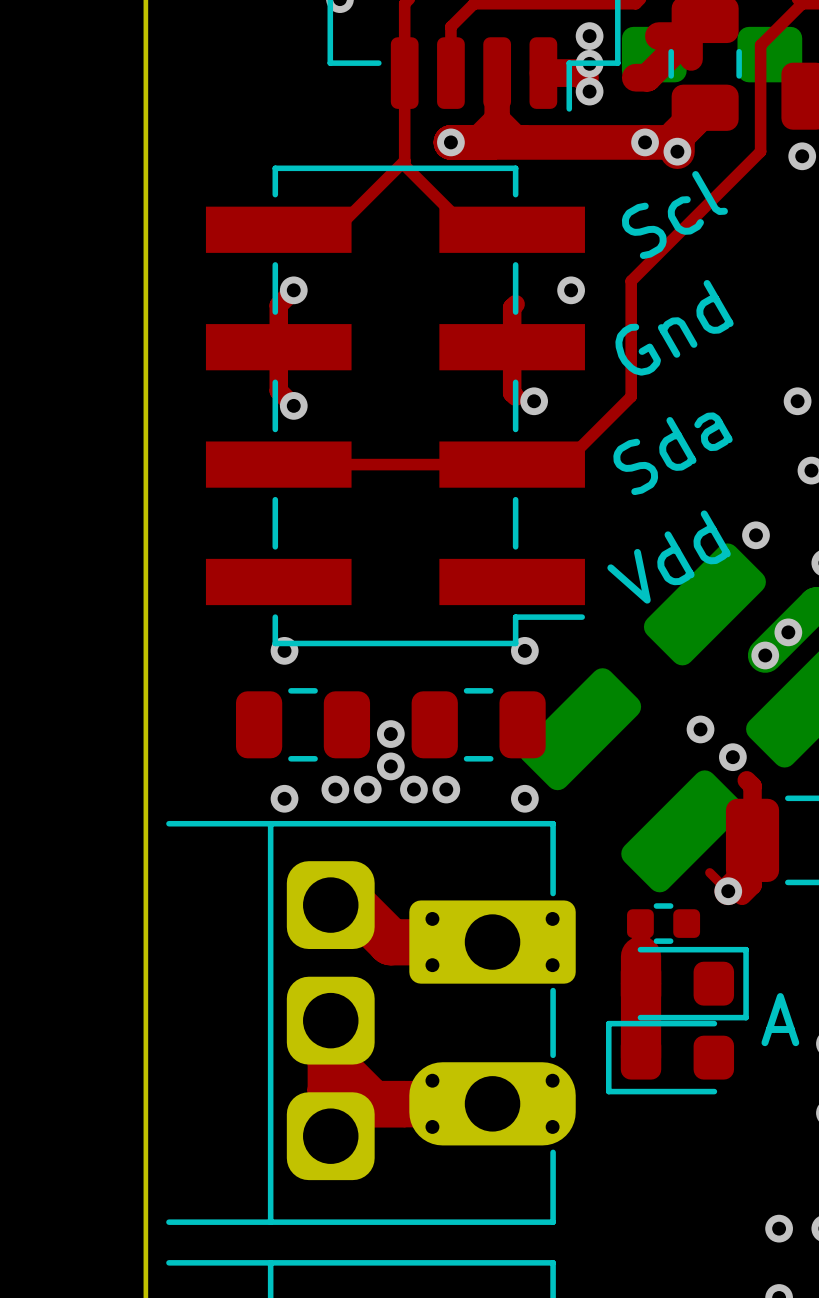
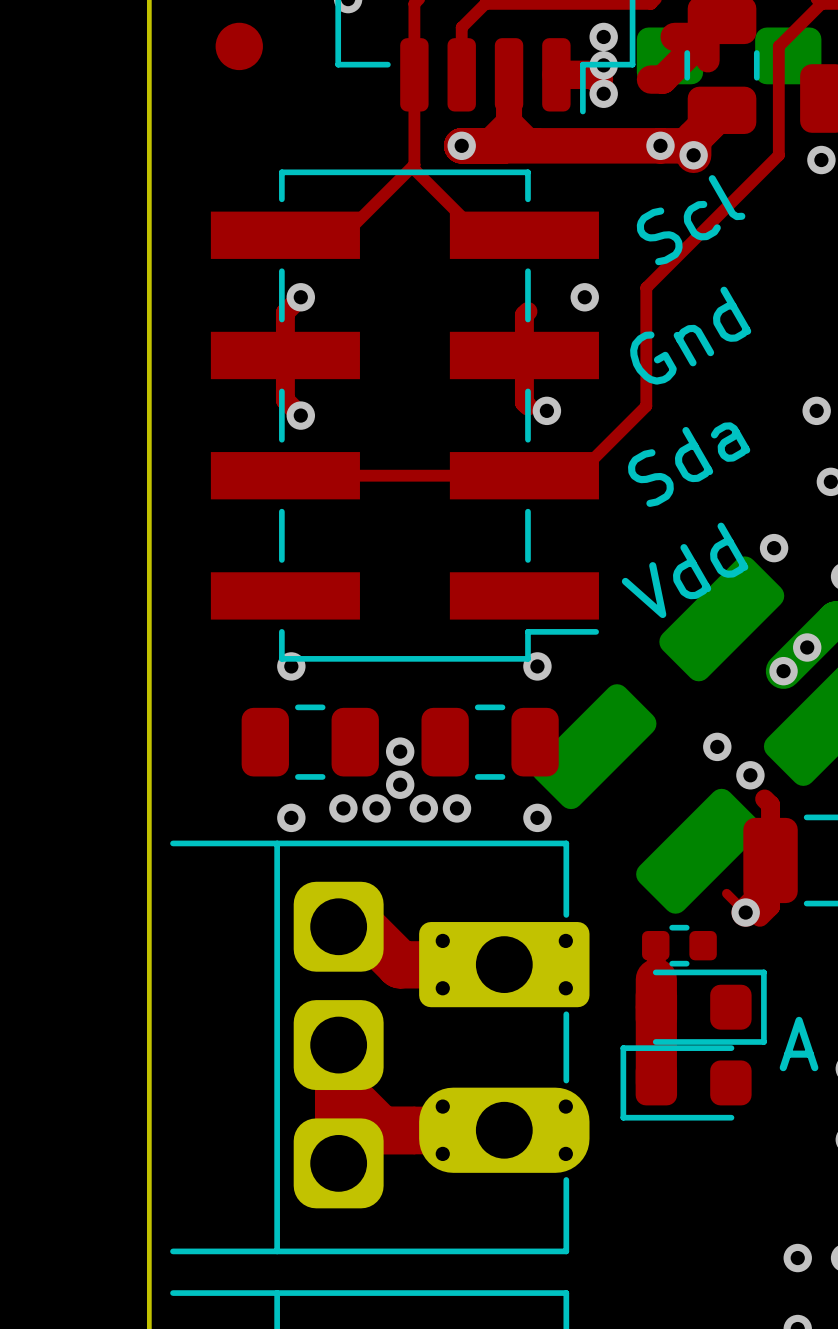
part: none -> (239, 46)

